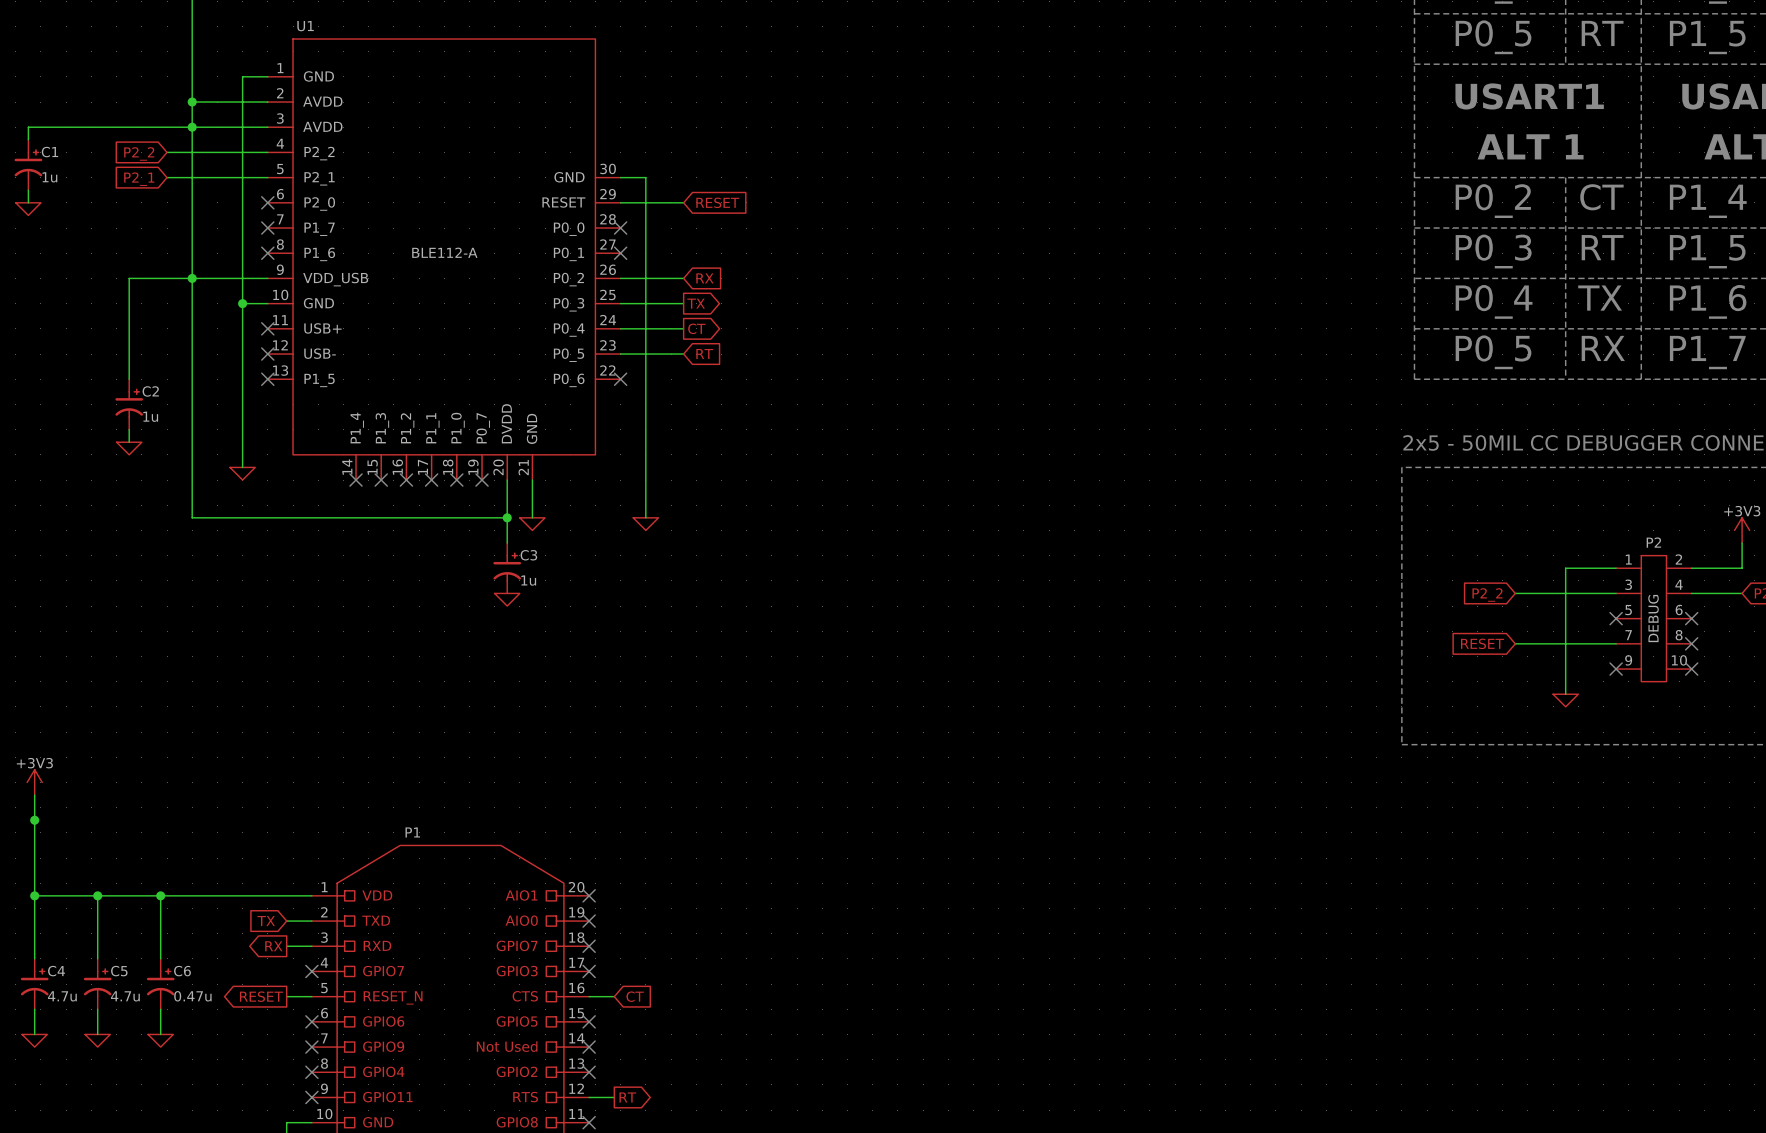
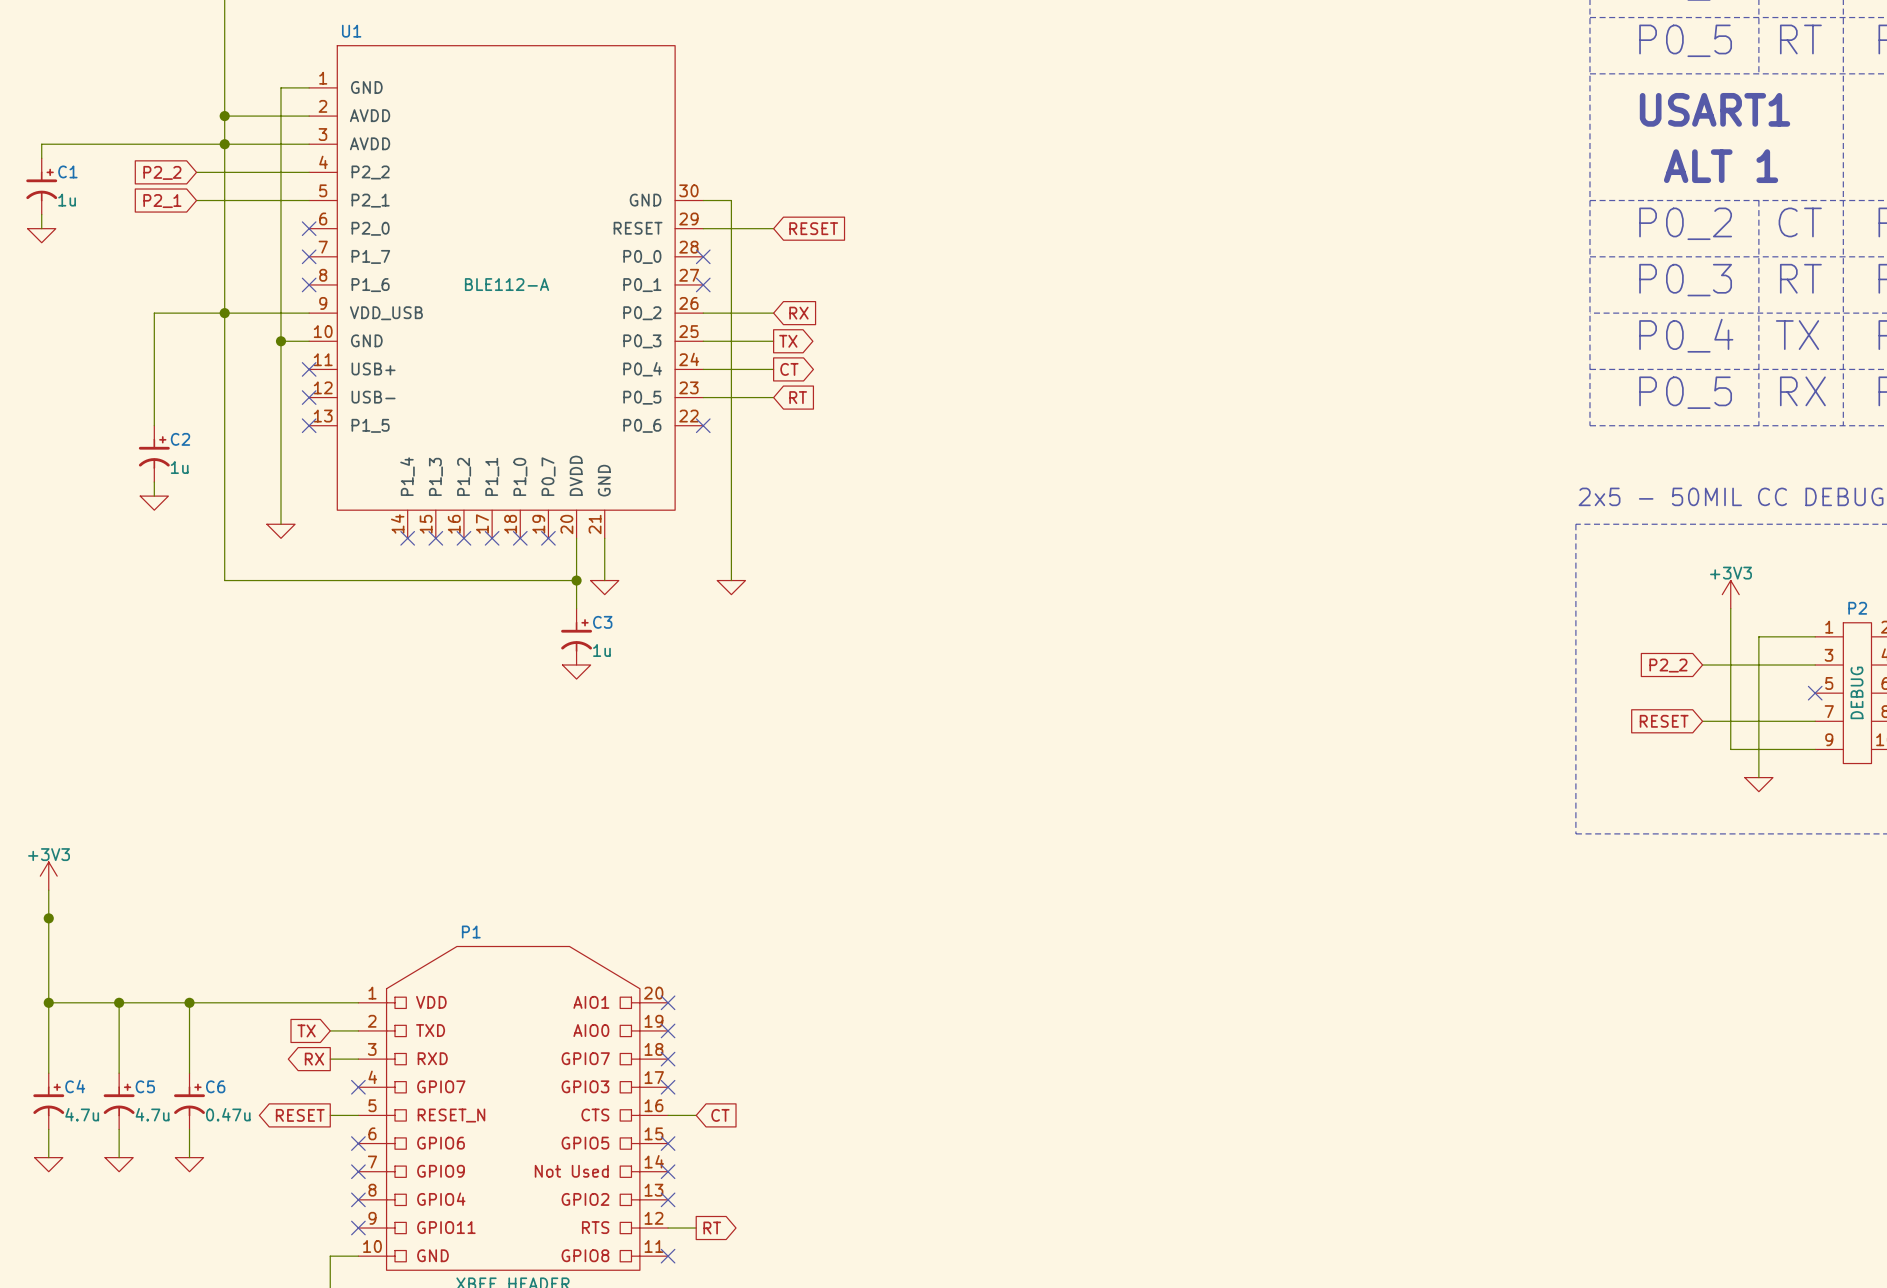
power symbol: none -> +3V3 (1730, 594)
wire: none -> (1730, 608) (1730, 749) (1815, 749)
no-connect mark: (1616, 669) -> none

